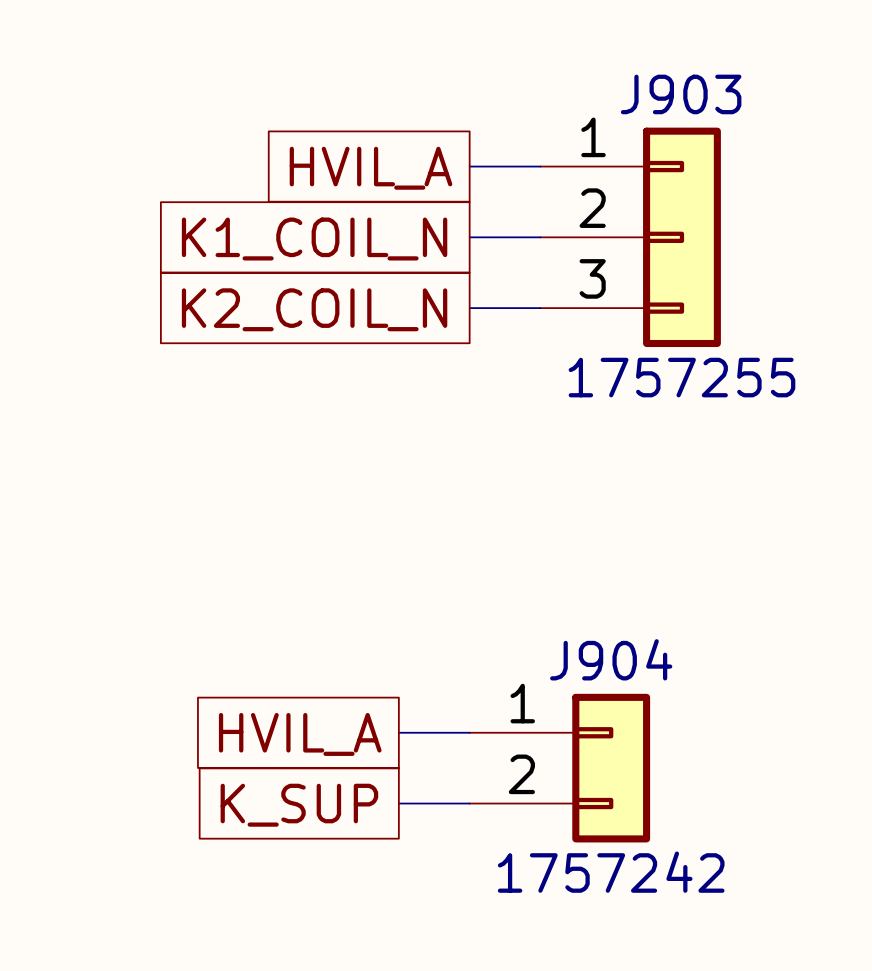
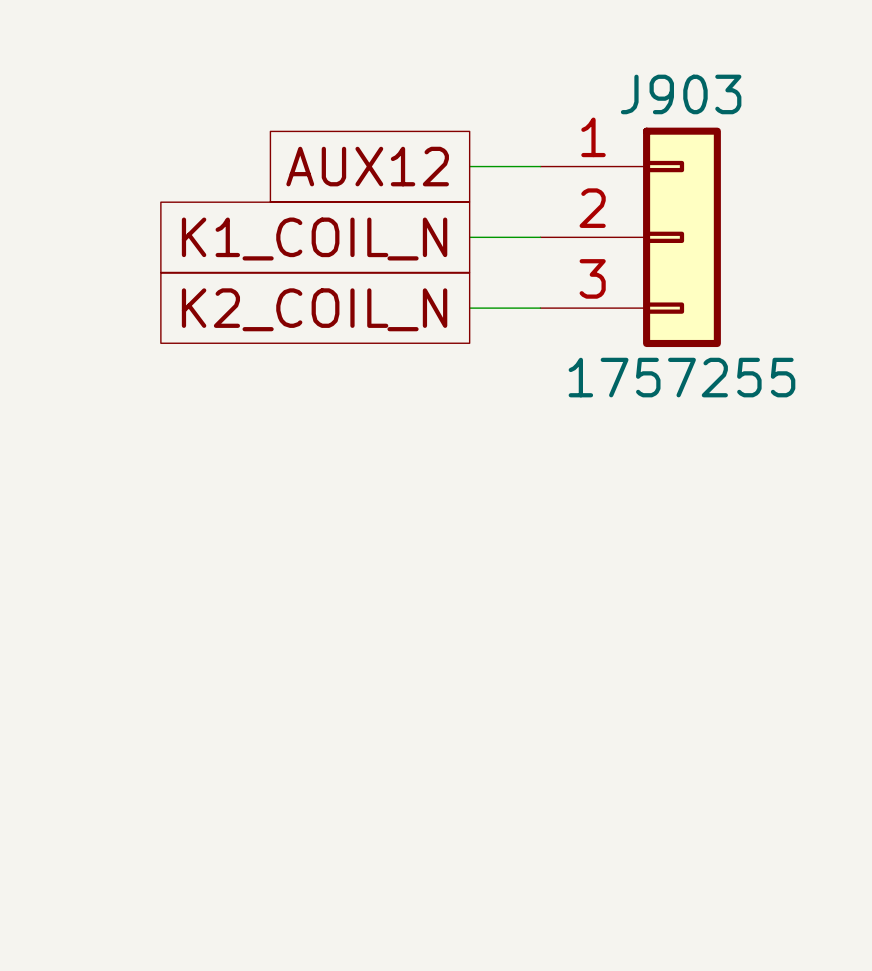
global label: HVIL_A (371, 168) -> AUX12 (367, 166)
wire: (398, 732) (469, 732) -> none
global label: HVIL_A (300, 734) -> none
J904: 1757242 (559, 768) -> none
wire: (398, 803) (469, 803) -> none
global label: K_SUP (299, 805) -> none

